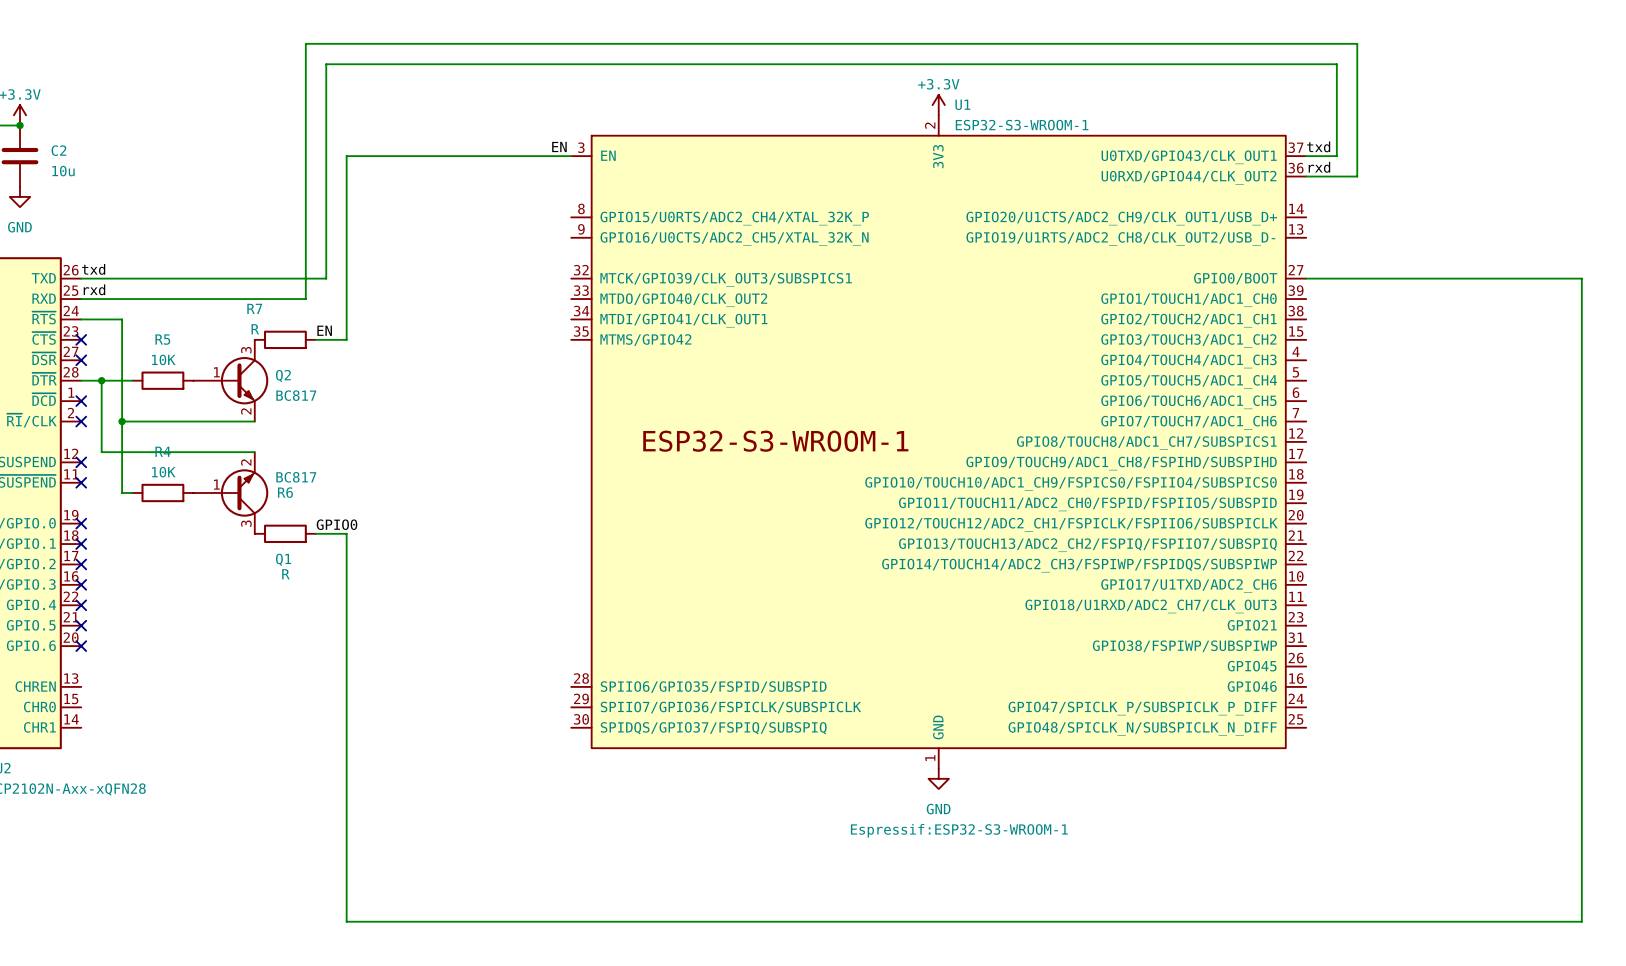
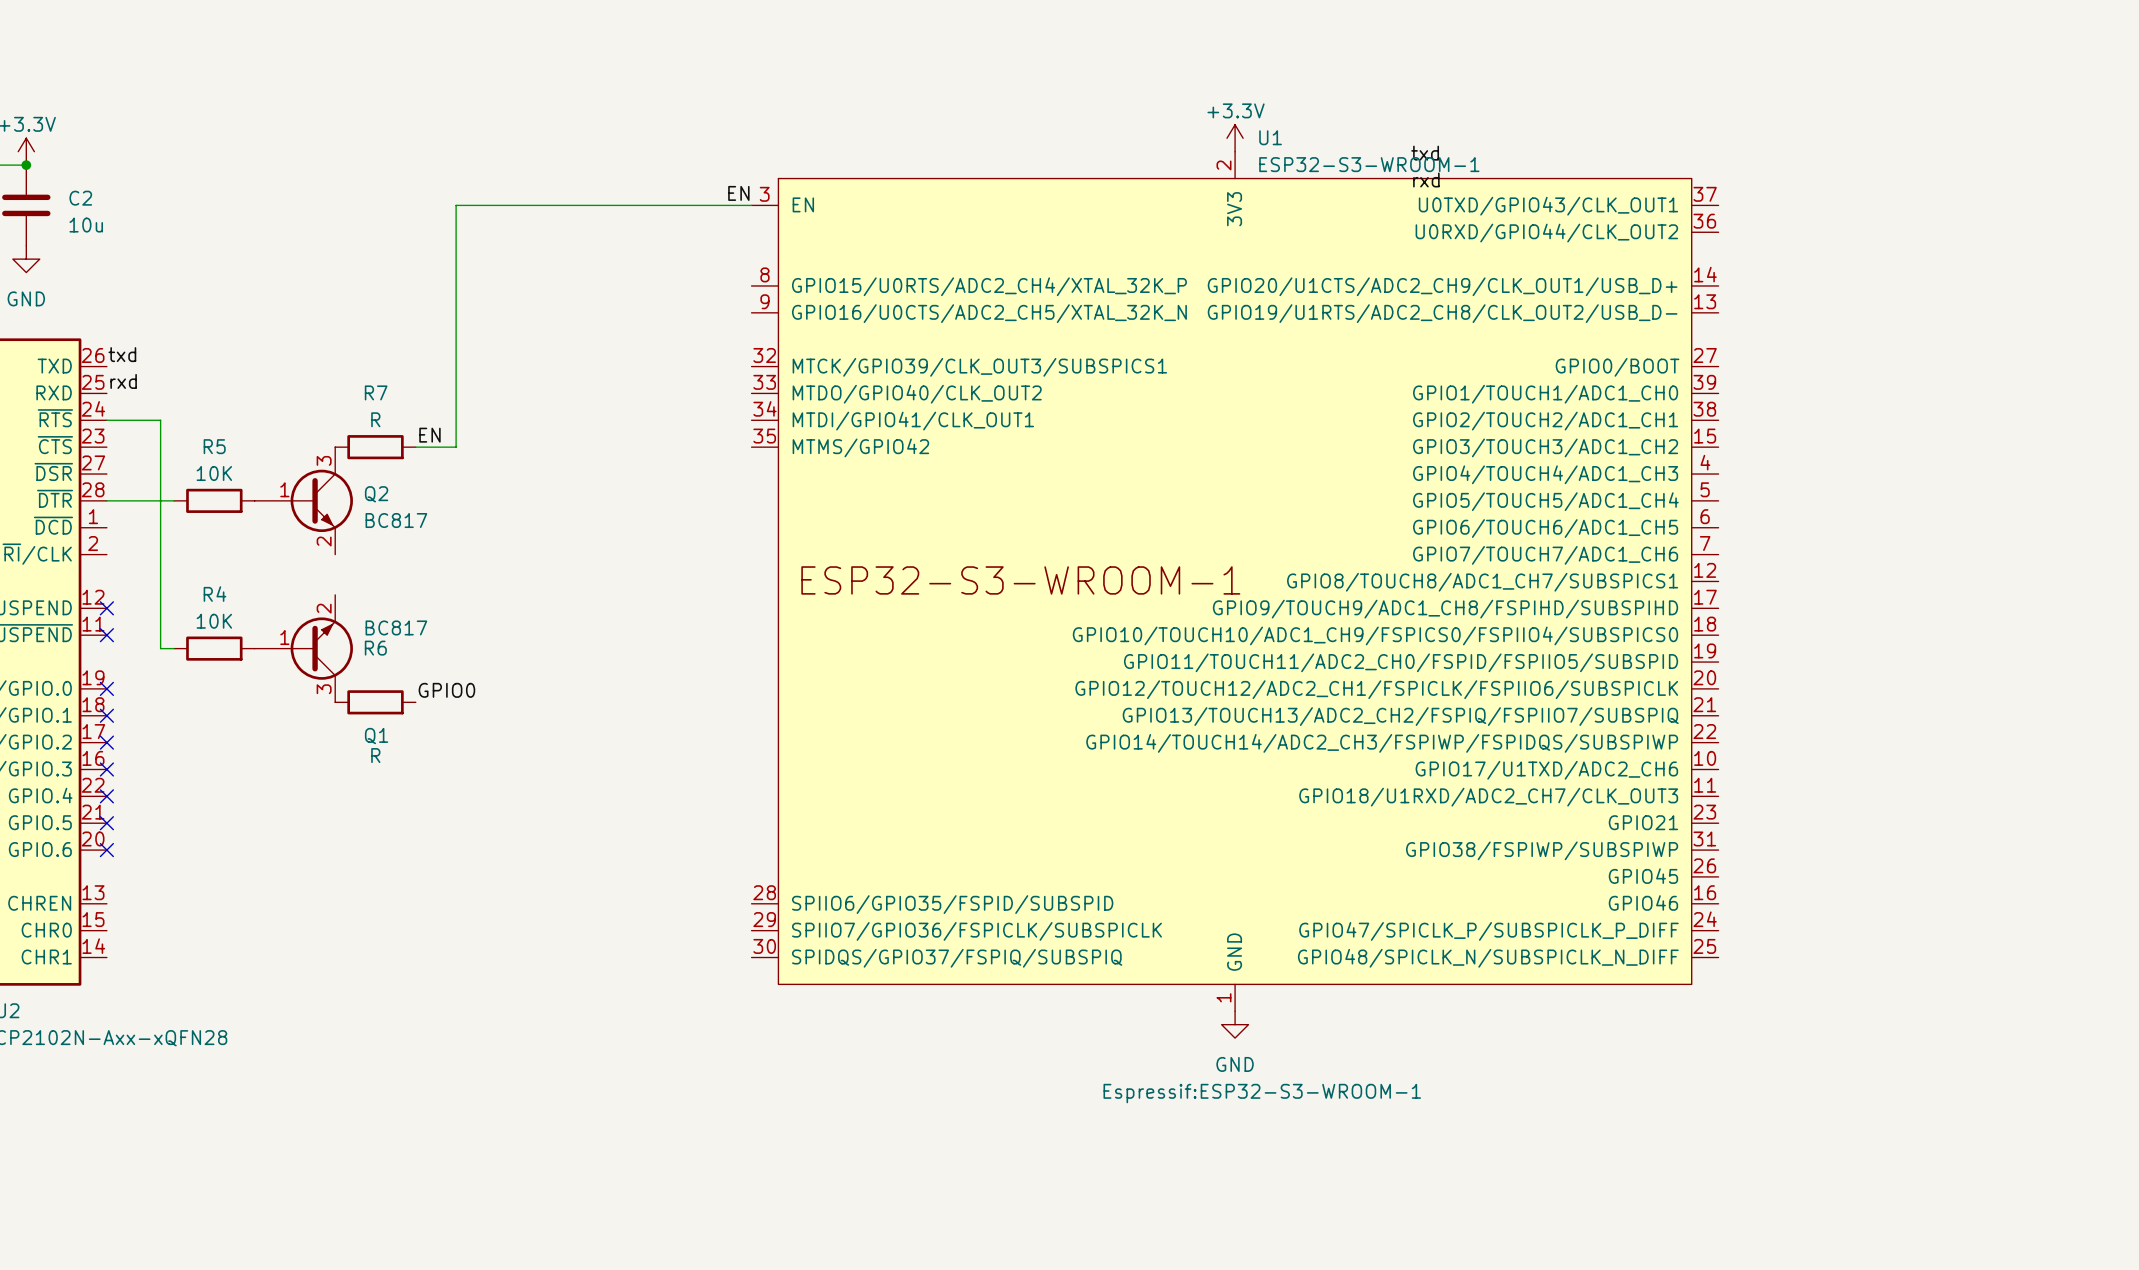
label: none -> txd (1425, 153)
label: none -> rxd (1426, 179)
label: txd (1318, 146) -> none
wire: (1306, 156) (1336, 156) (1336, 64) (326, 64) (326, 278) (81, 278) -> none
label: rxd (1319, 167) -> none
wire: (1306, 176) (1357, 176) (1357, 43) (305, 43) (305, 299) (81, 299) -> none
wire: (1306, 278) (1581, 278) (1581, 921) (346, 921) (346, 533) (316, 533) -> none
R7 name position: R7 (254, 308) -> R7 (376, 392)
R7 value position: R (255, 329) -> R (375, 419)
no-connect mark: (81, 339) -> none
no-connect mark: (81, 360) -> none
wire: (101, 380) (101, 452) (254, 452) -> none
junction: (101, 380) -> none
no-connect mark: (81, 401) -> none
no-connect mark: (81, 421) -> none
wire: (122, 421) (254, 421) -> none
junction: (122, 421) -> none

